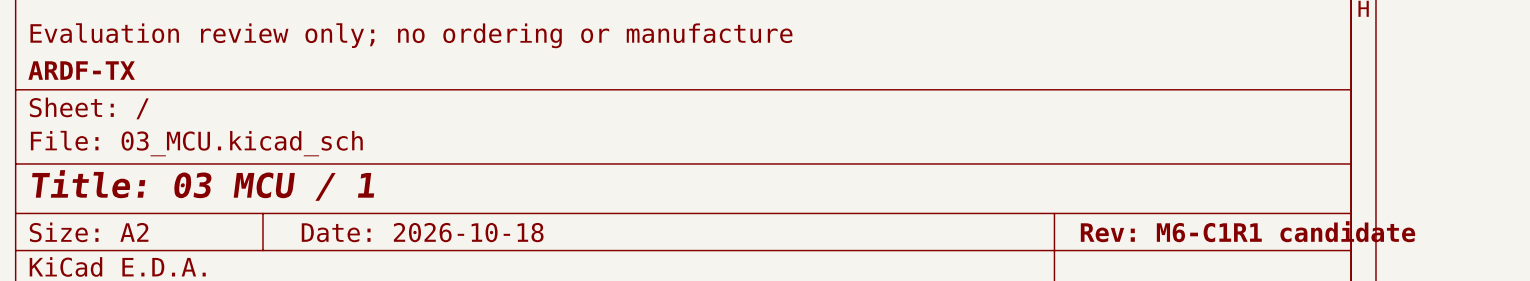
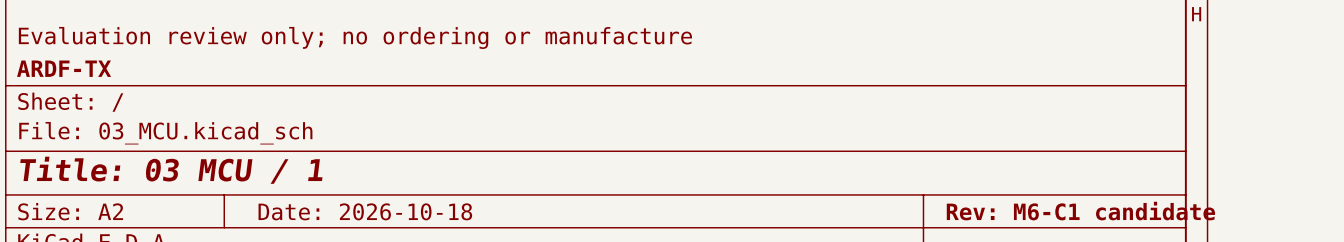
title block: Rev: M6-C1R1 candidate (1247, 231) -> Rev: M6-C1 candidate (1080, 211)

